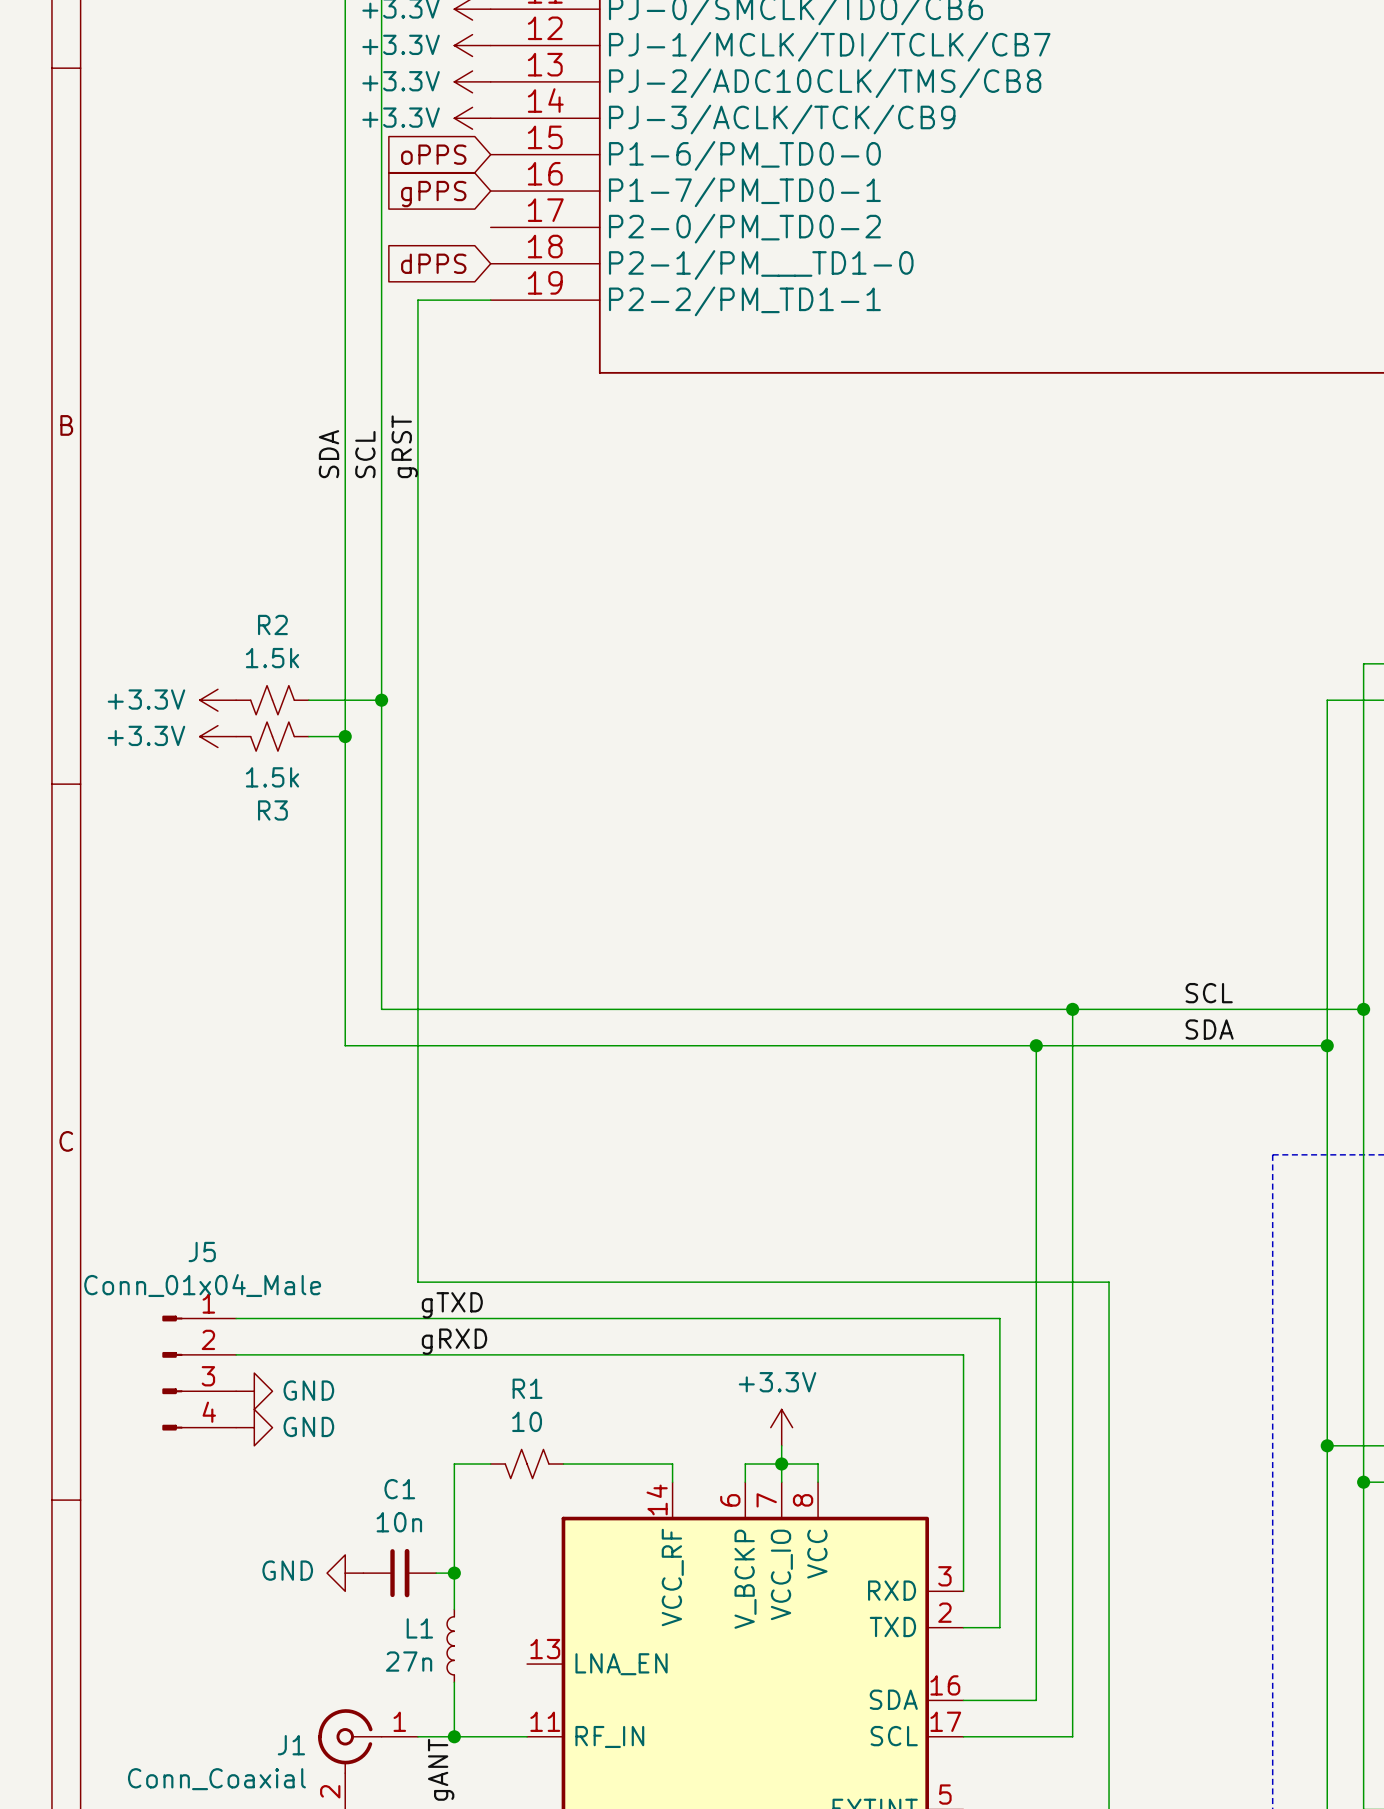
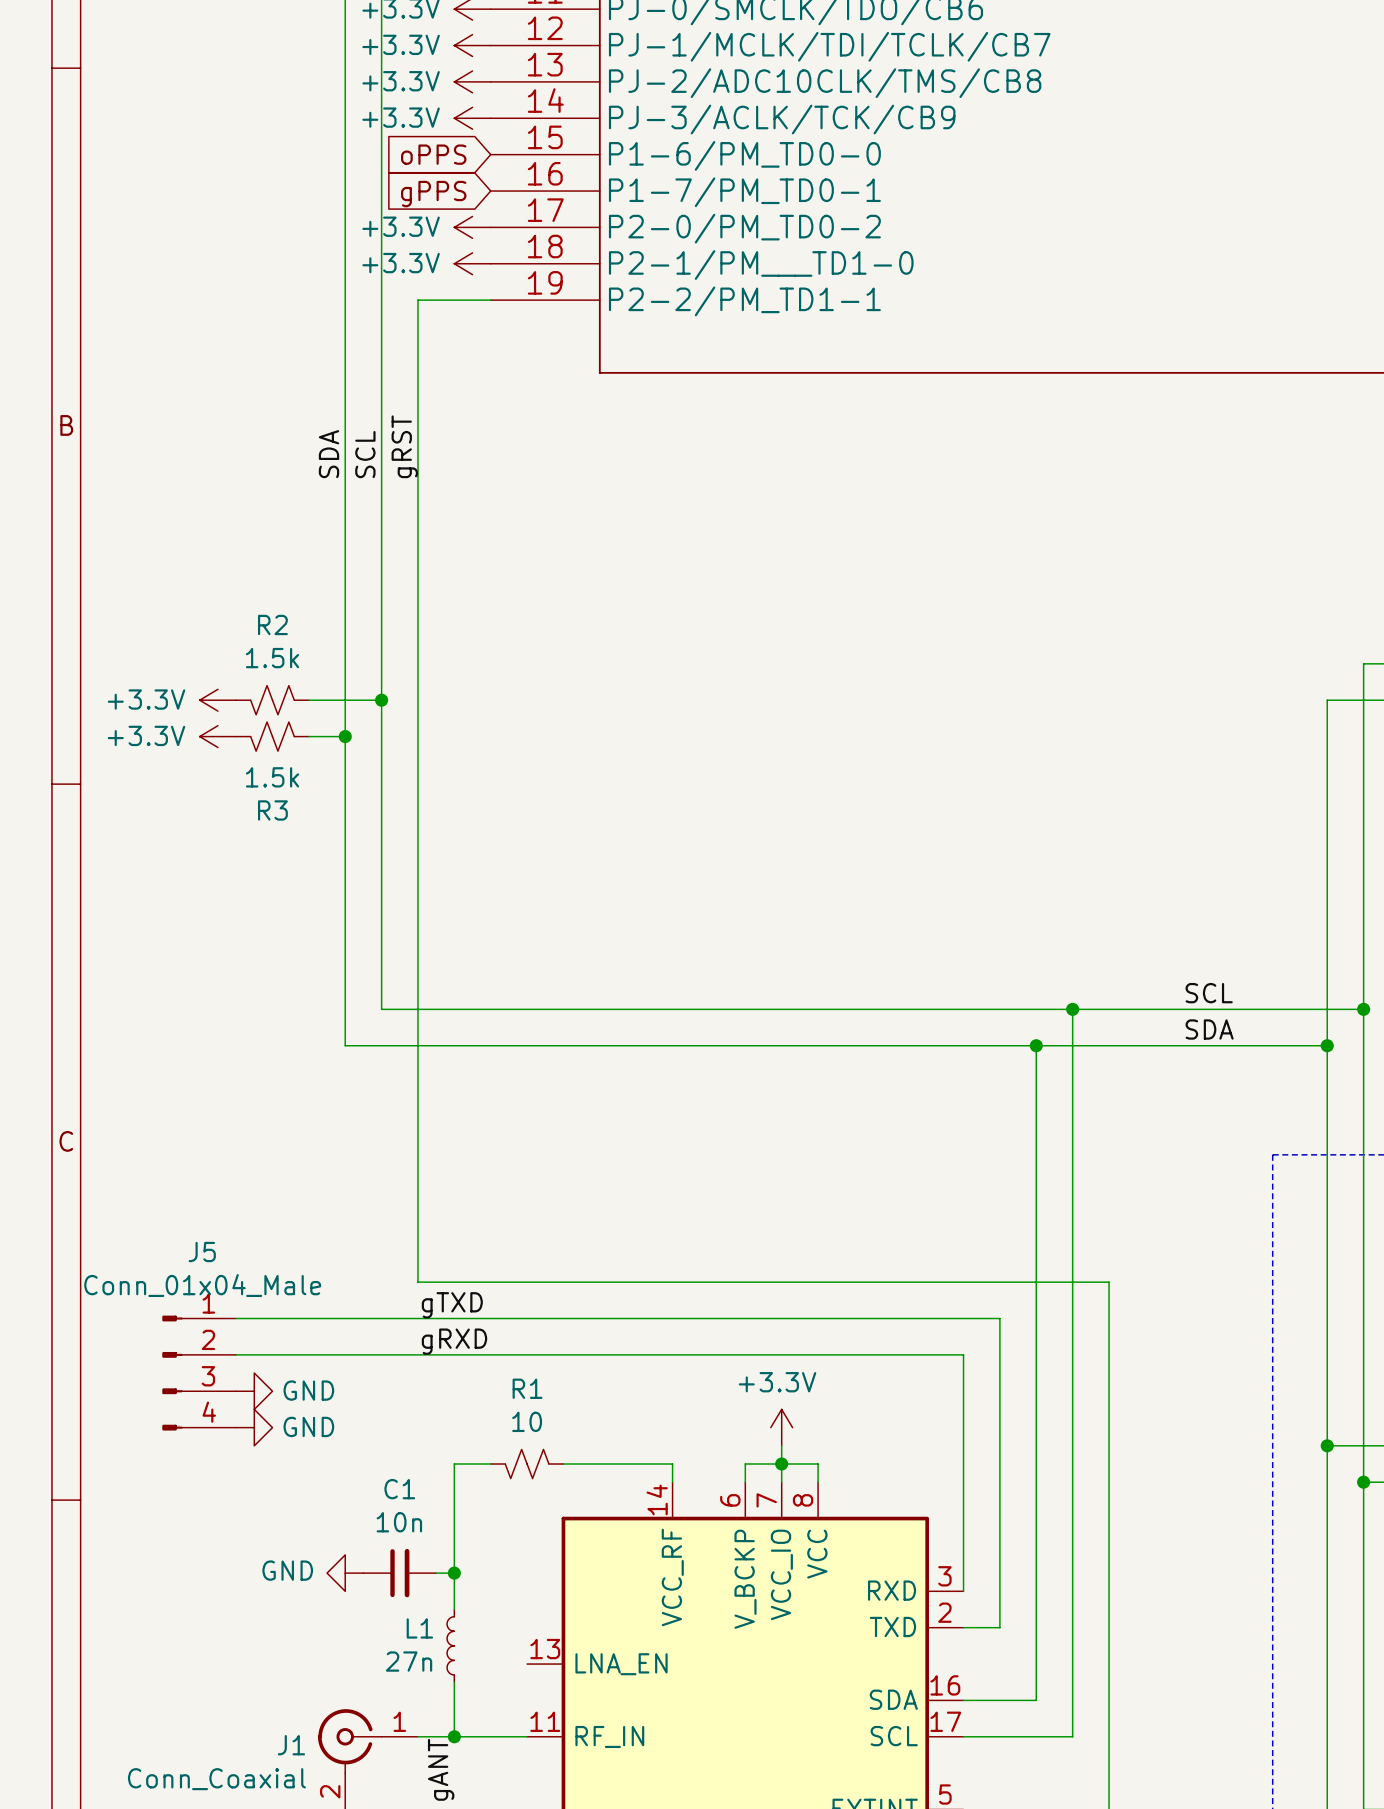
power symbol: none -> +3.3V (472, 227)
global label: dPPS (433, 263) -> none
power symbol: none -> +3.3V (472, 263)

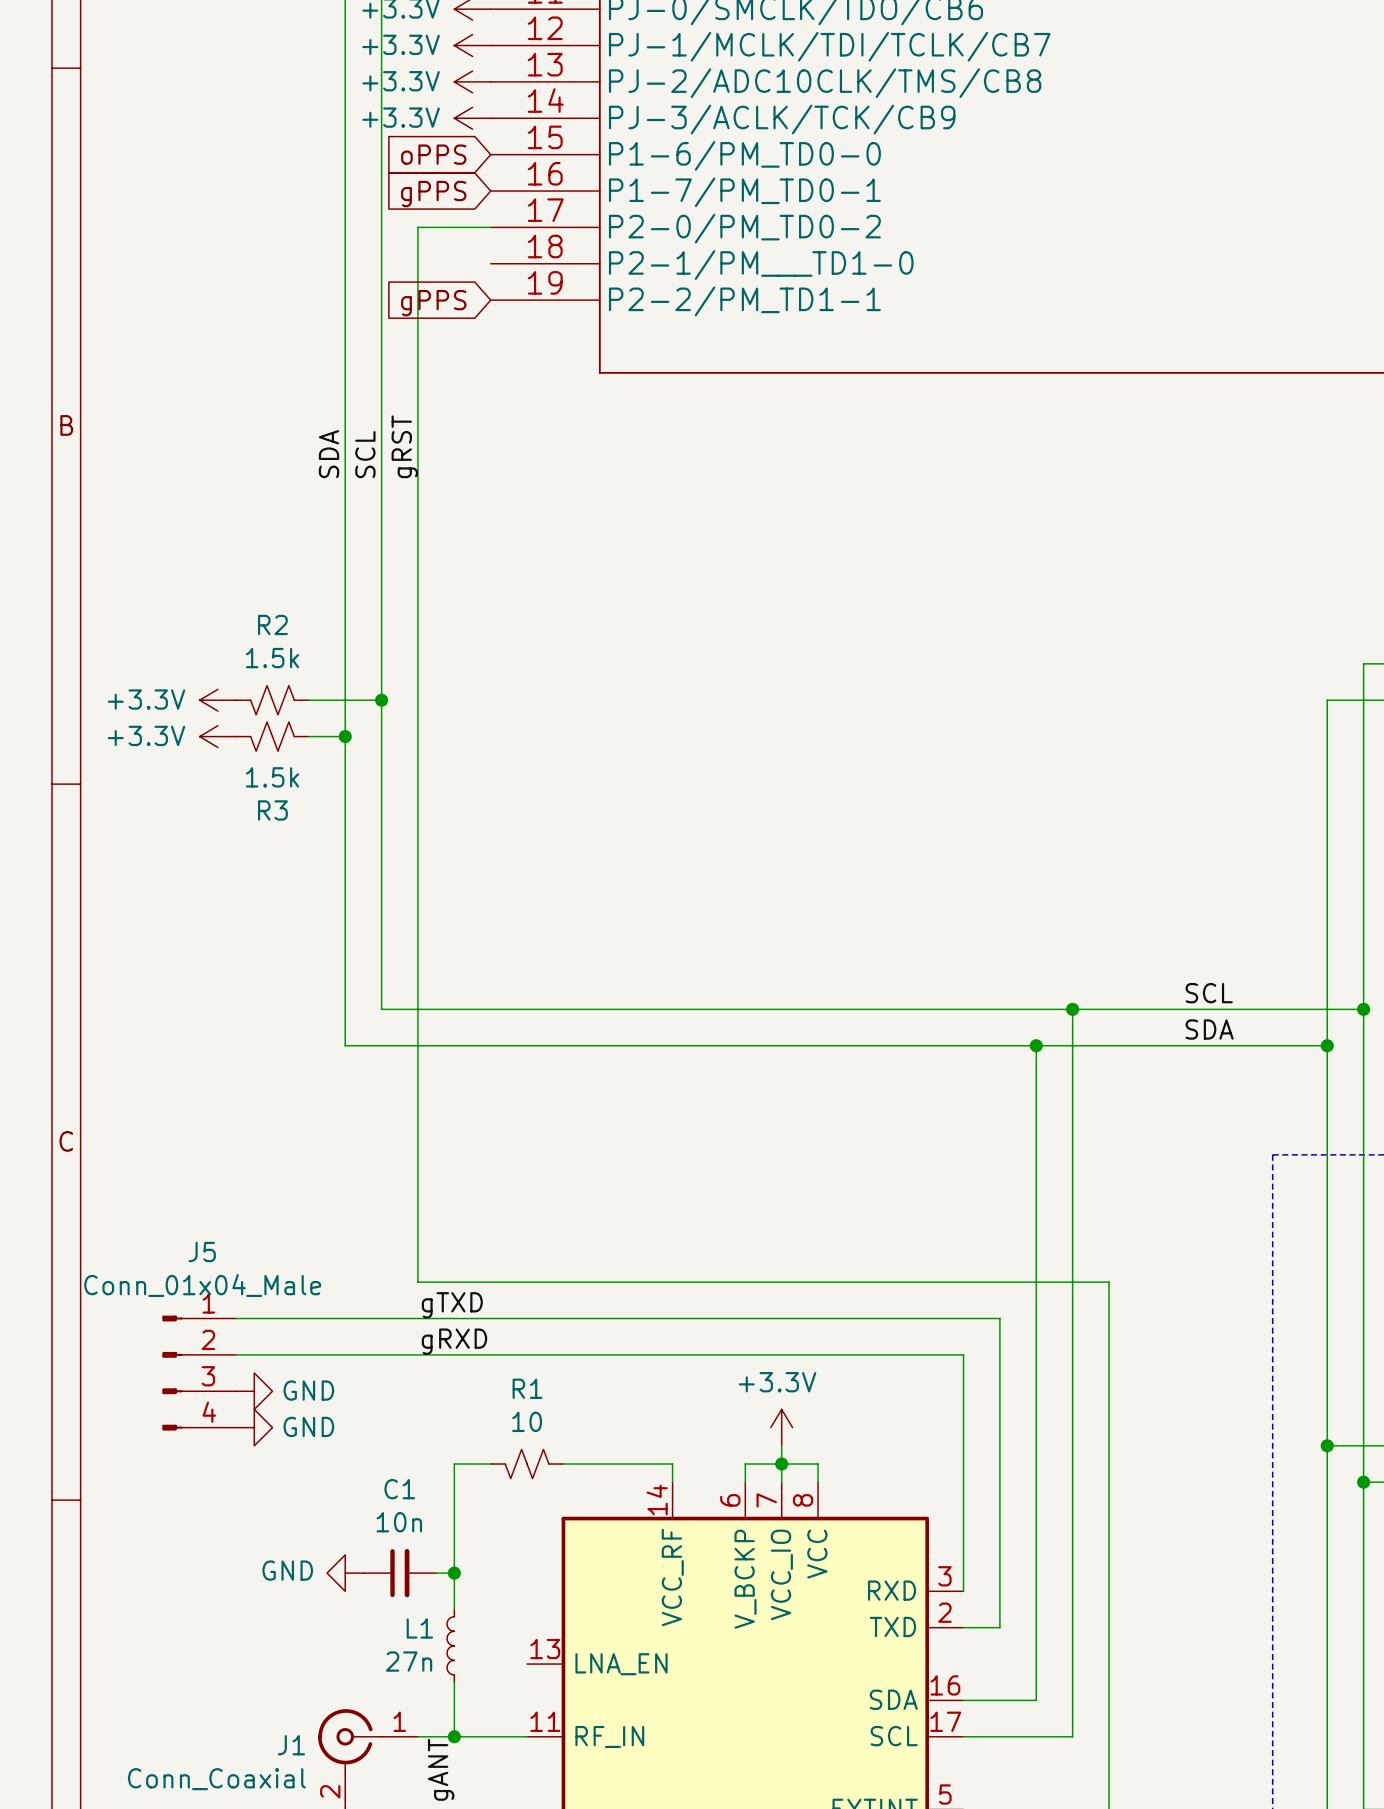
power symbol: +3.3V (472, 227) -> none
power symbol: +3.3V (472, 263) -> none
wire: (417, 300) (490, 300) -> (417, 300) (417, 227) (490, 227)
global label: none -> gPPS (433, 303)

